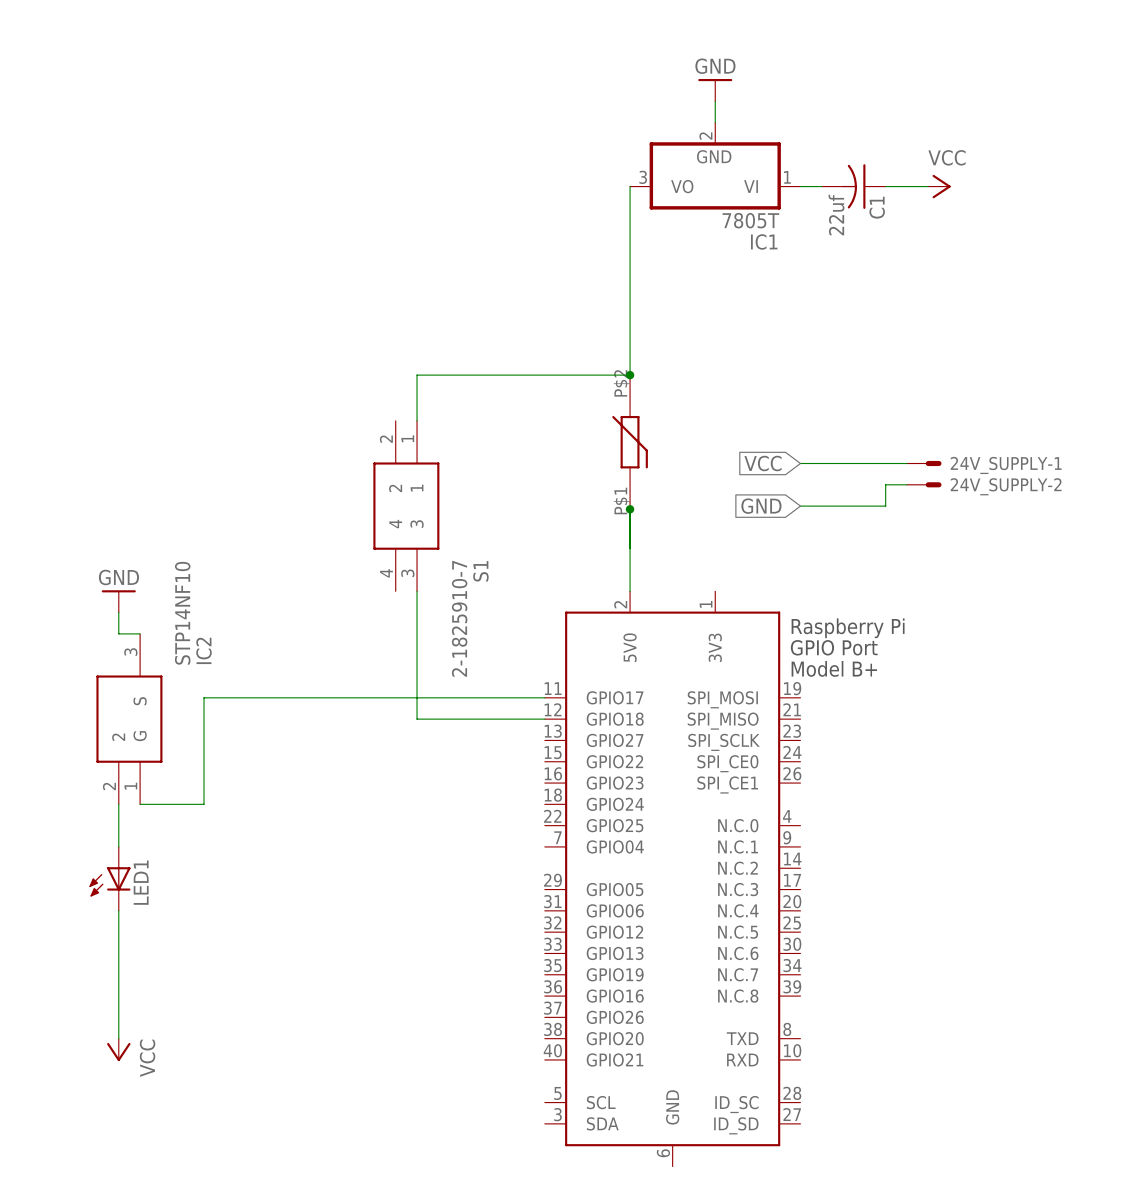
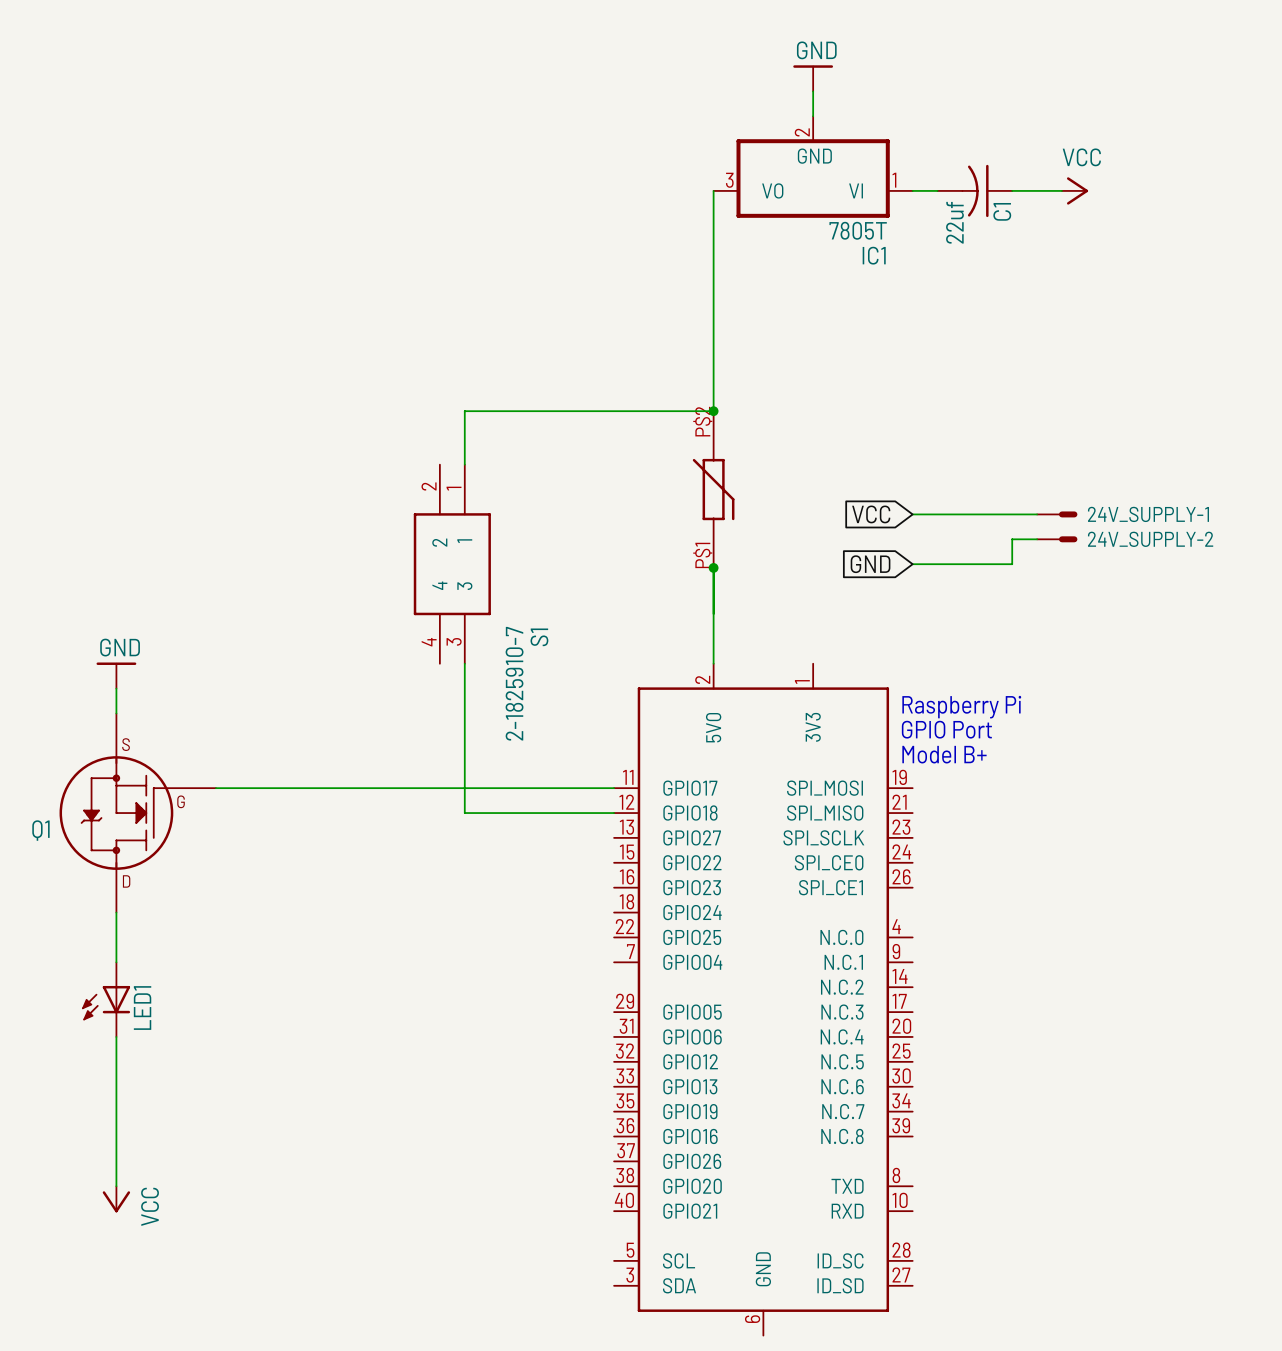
wire: (118, 633) (140, 633) -> none
wire: (203, 697) (203, 804) (140, 804) -> none
IC2: STP14NF10 (129, 719) -> none
Q1: none -> (137, 813)

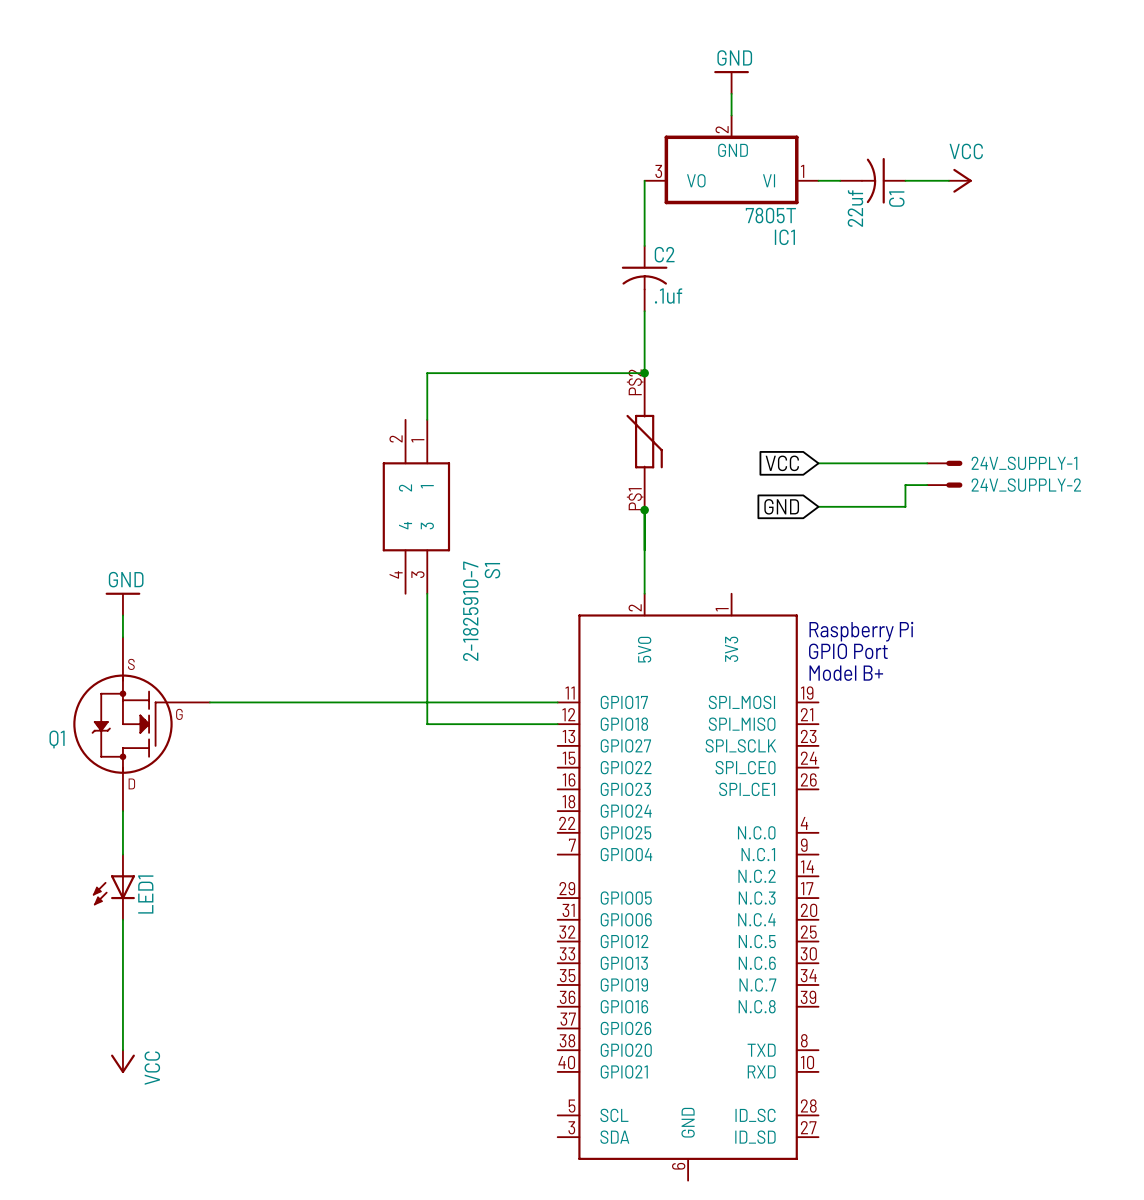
C2: none -> .1uf (644, 278)

